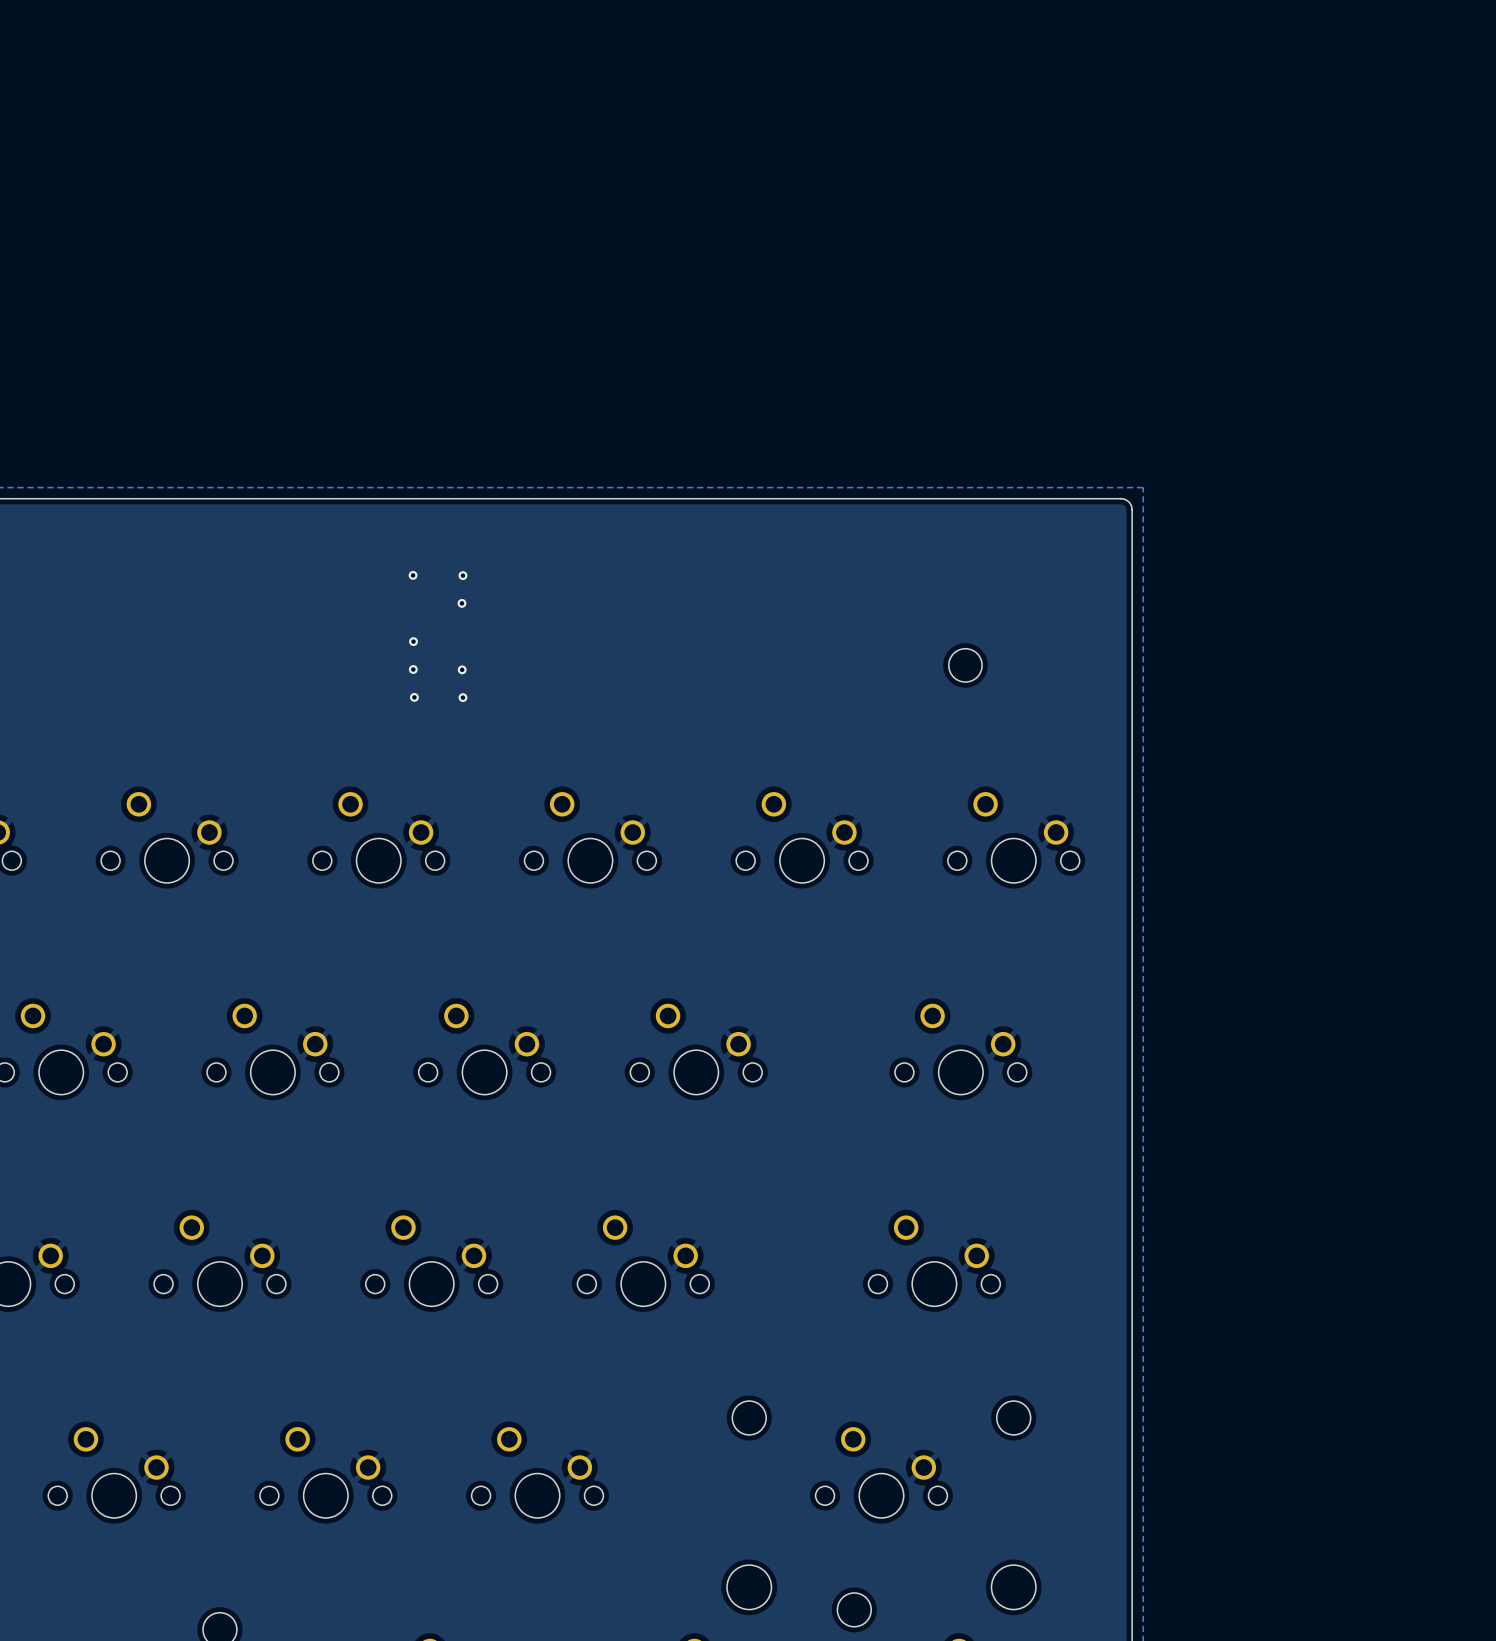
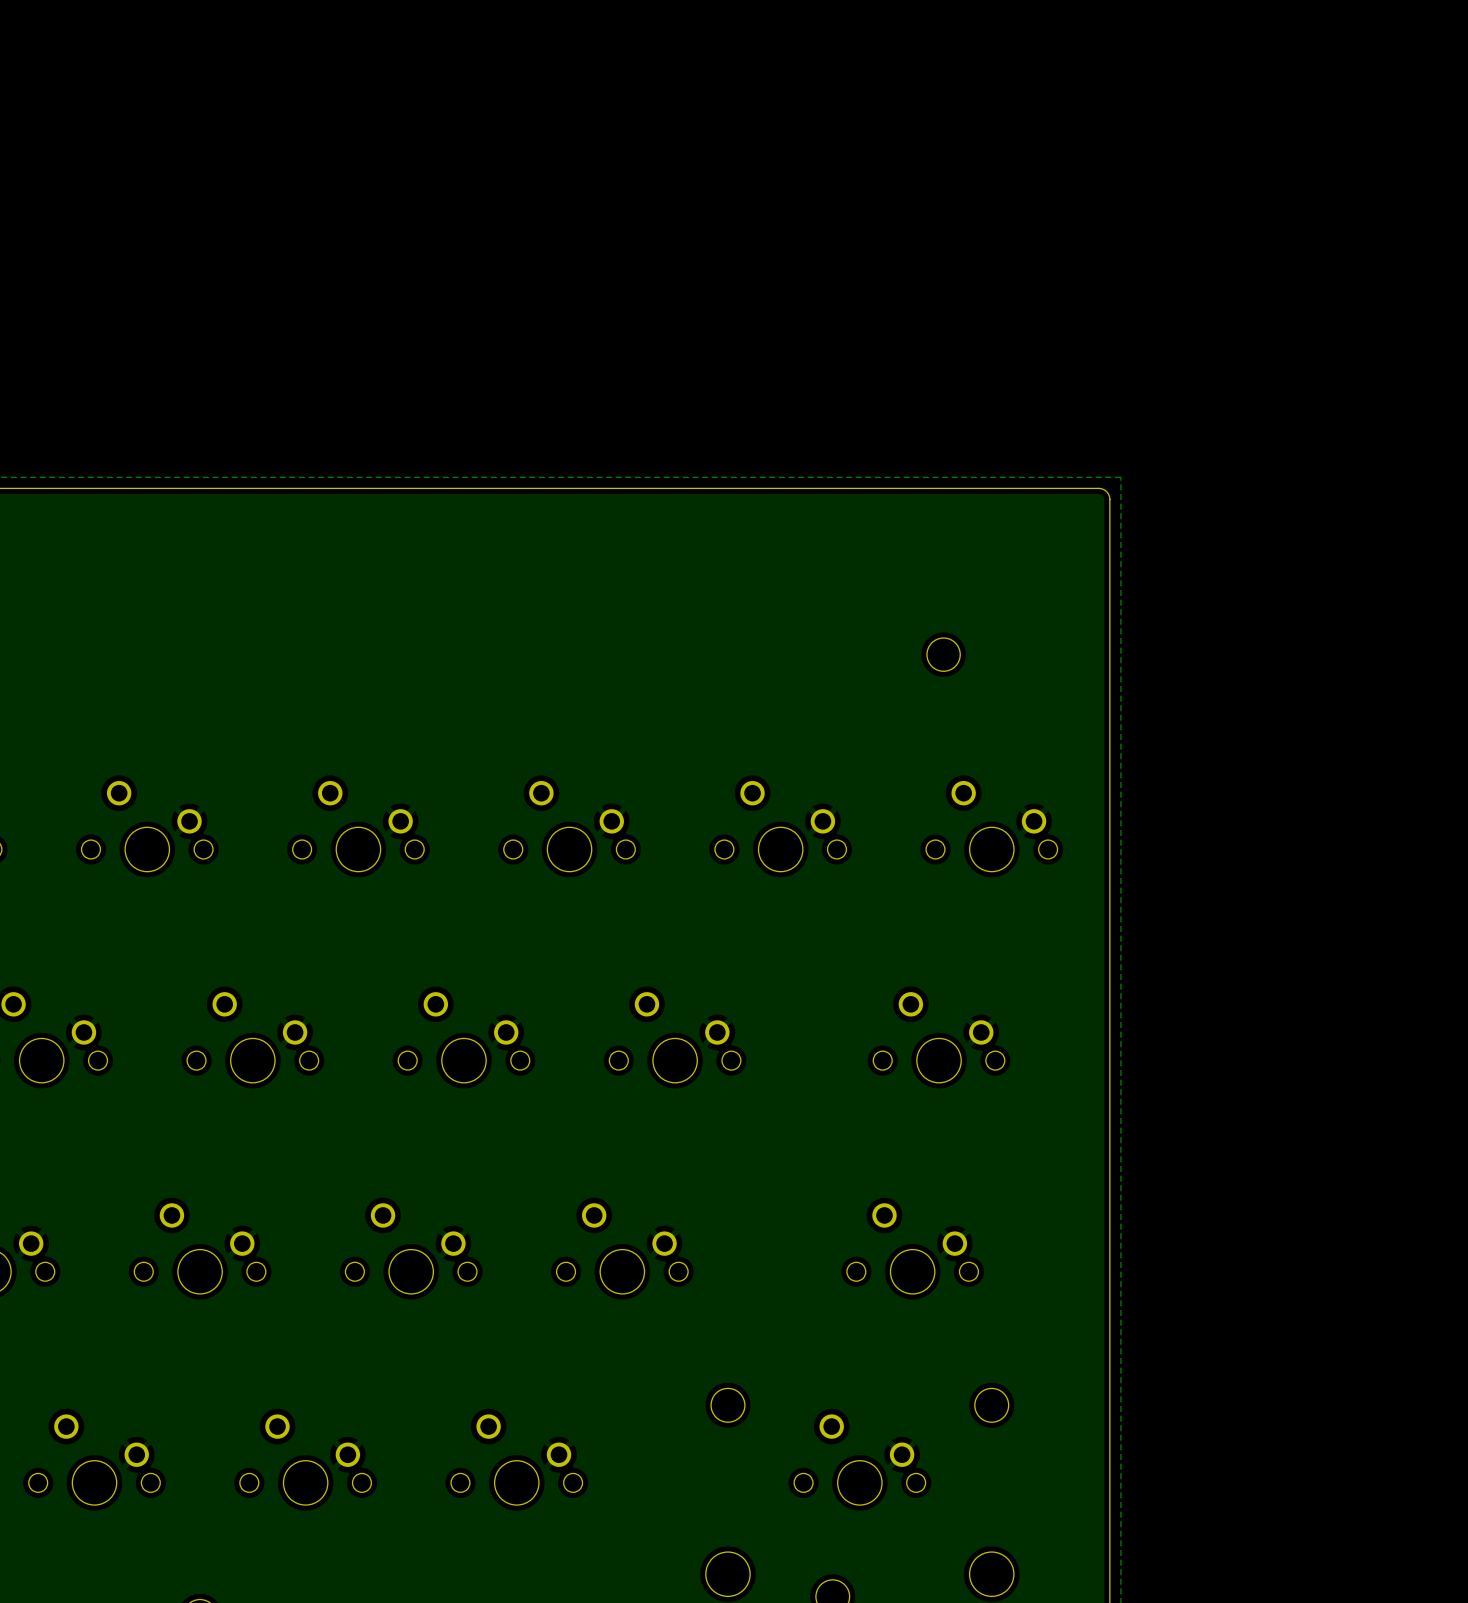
via: (413, 575) -> none
via: (462, 575) -> none
via: (461, 603) -> none
via: (413, 641) -> none
via: (413, 669) -> none
via: (462, 669) -> none
via: (414, 697) -> none
via: (462, 697) -> none

